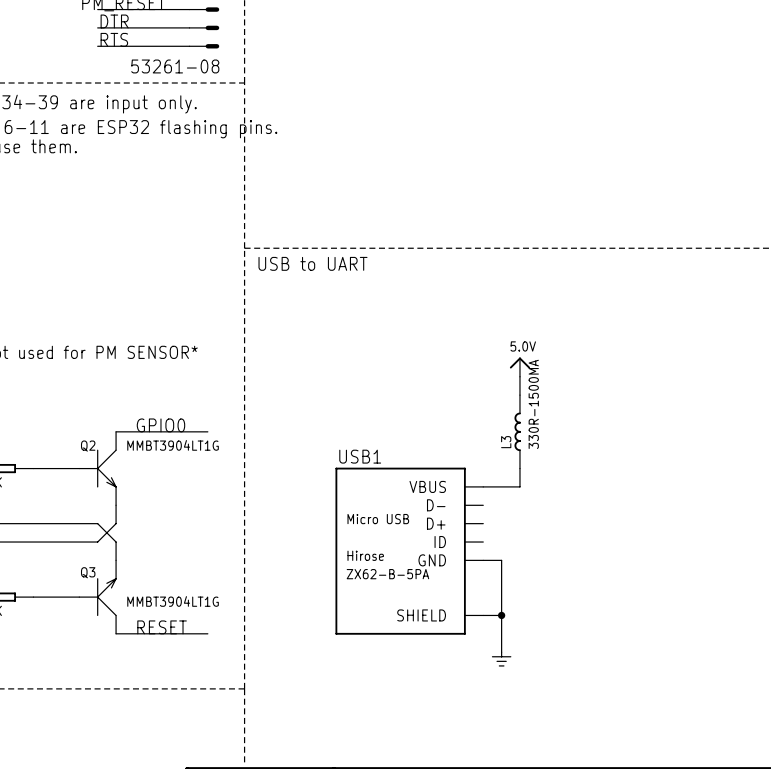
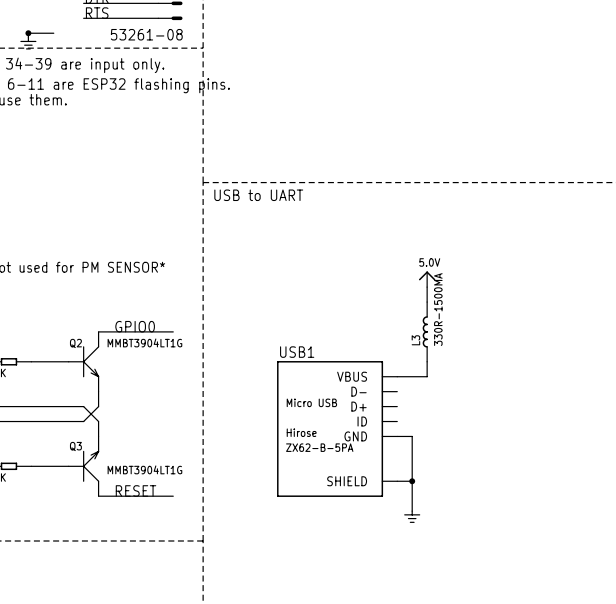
junction: none -> (28, 33)
wire: none -> (53, 33) (28, 33) (28, 37)
power symbol: none -> (28, 43)

